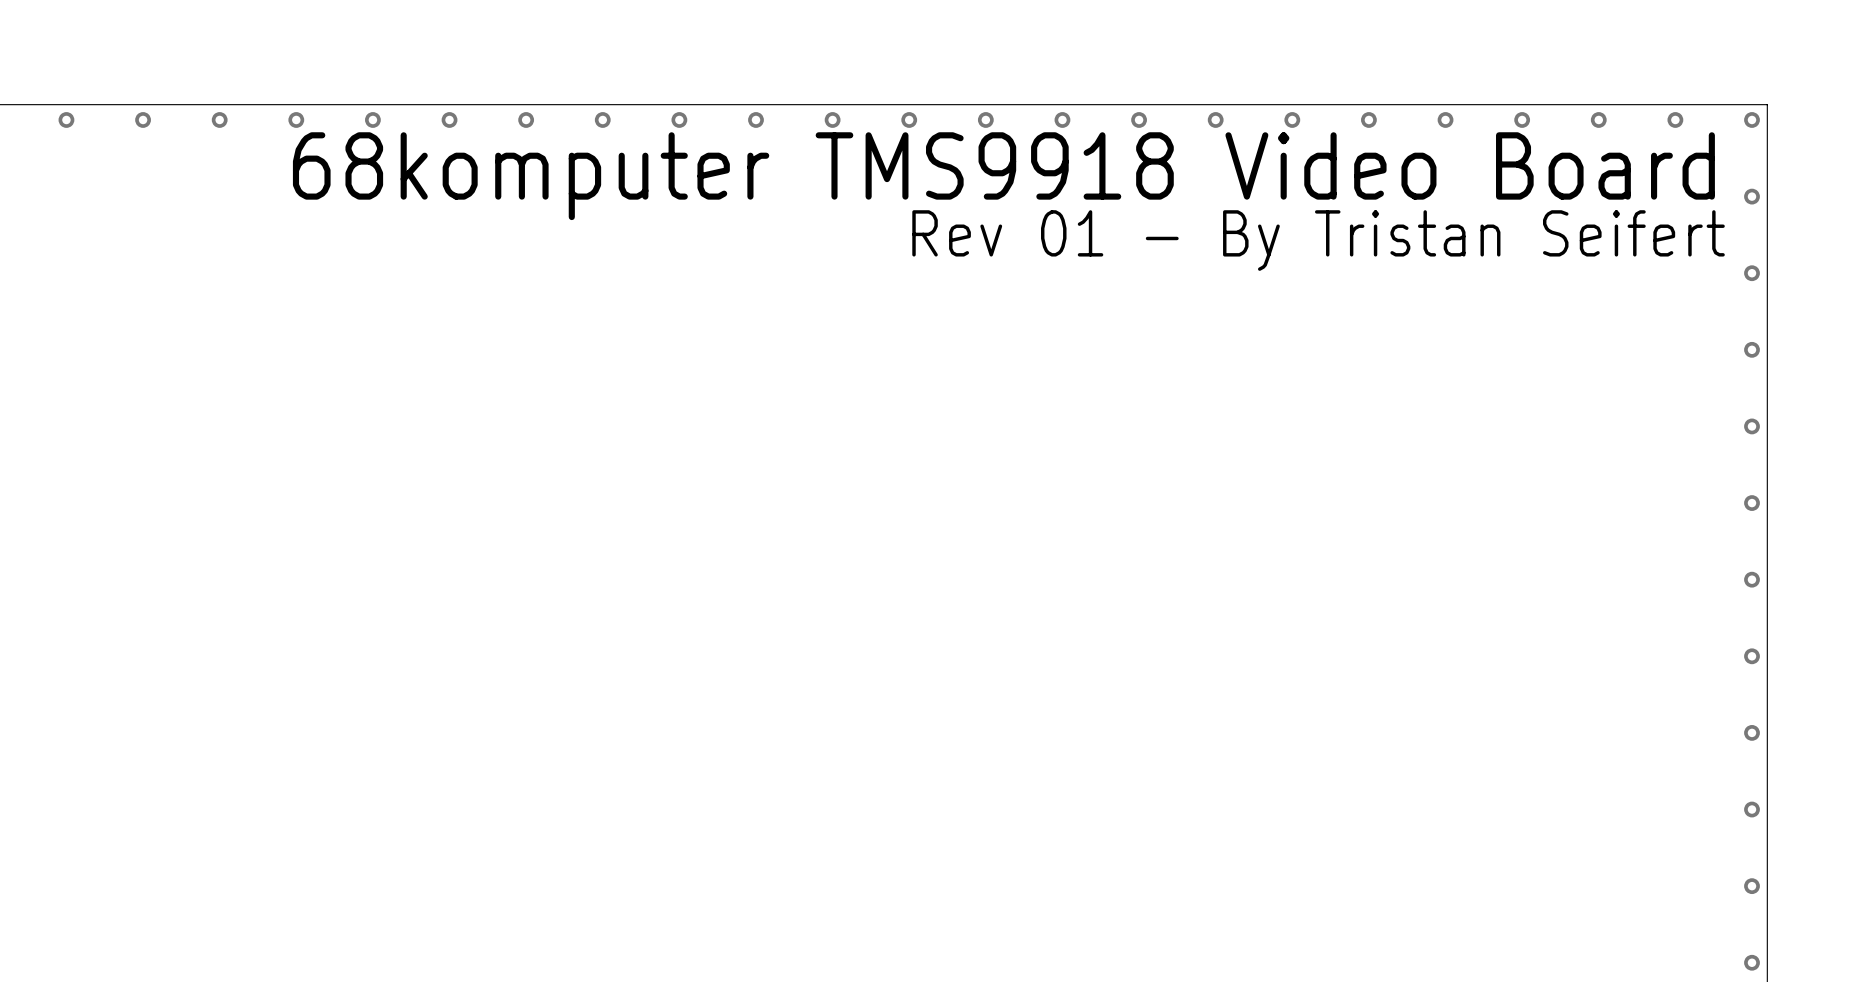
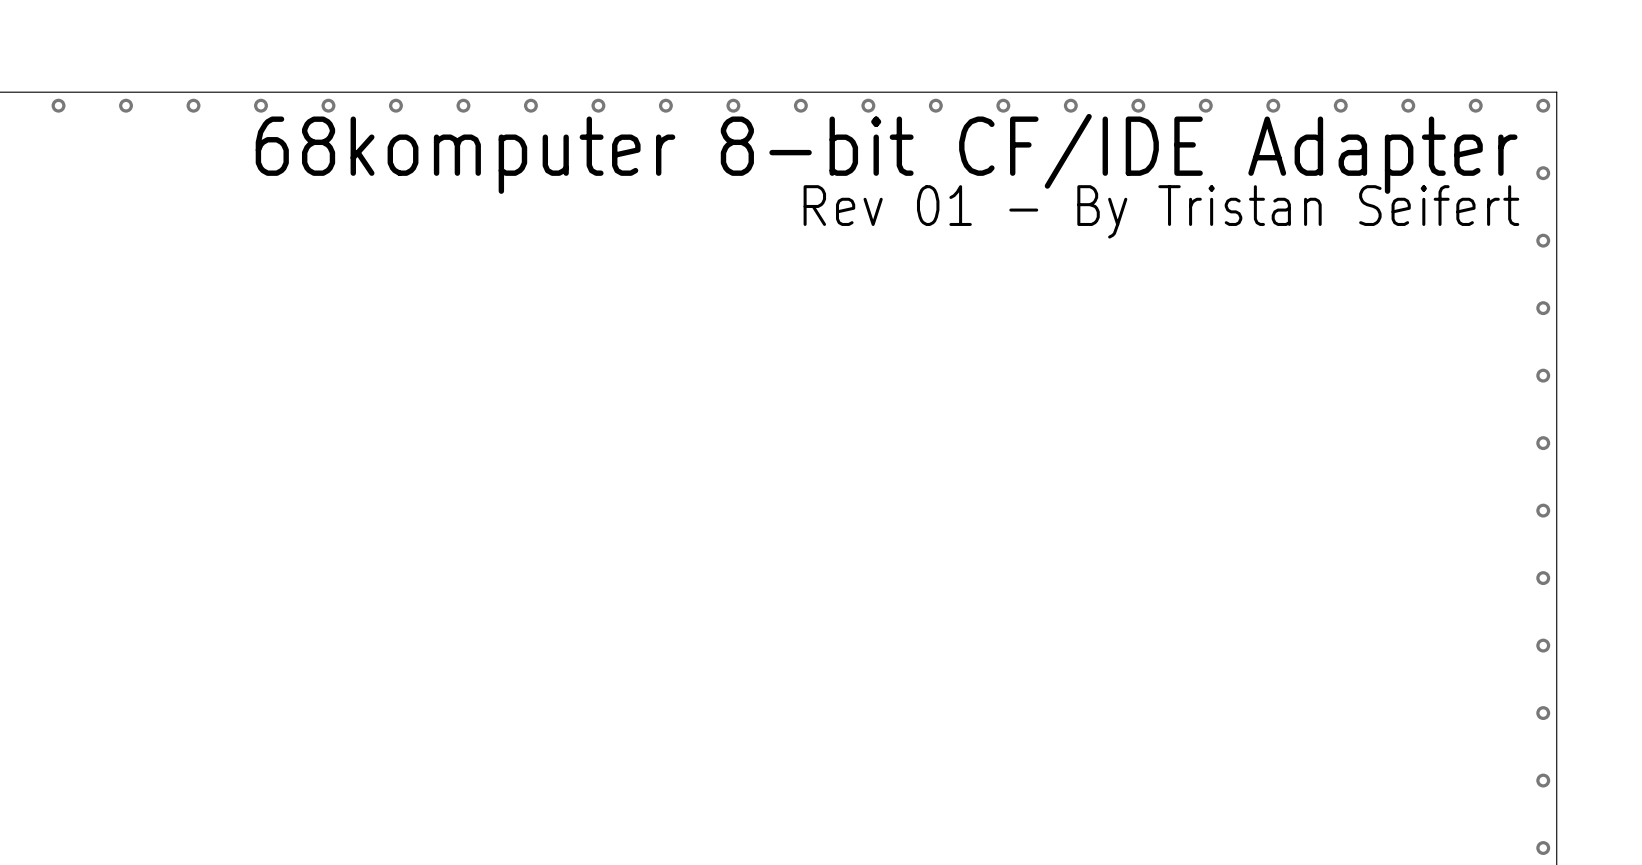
text: 68komputer TMS9918 Video Board (1003, 176) -> 68komputer 8-bit CF/IDE Adapter (886, 153)

